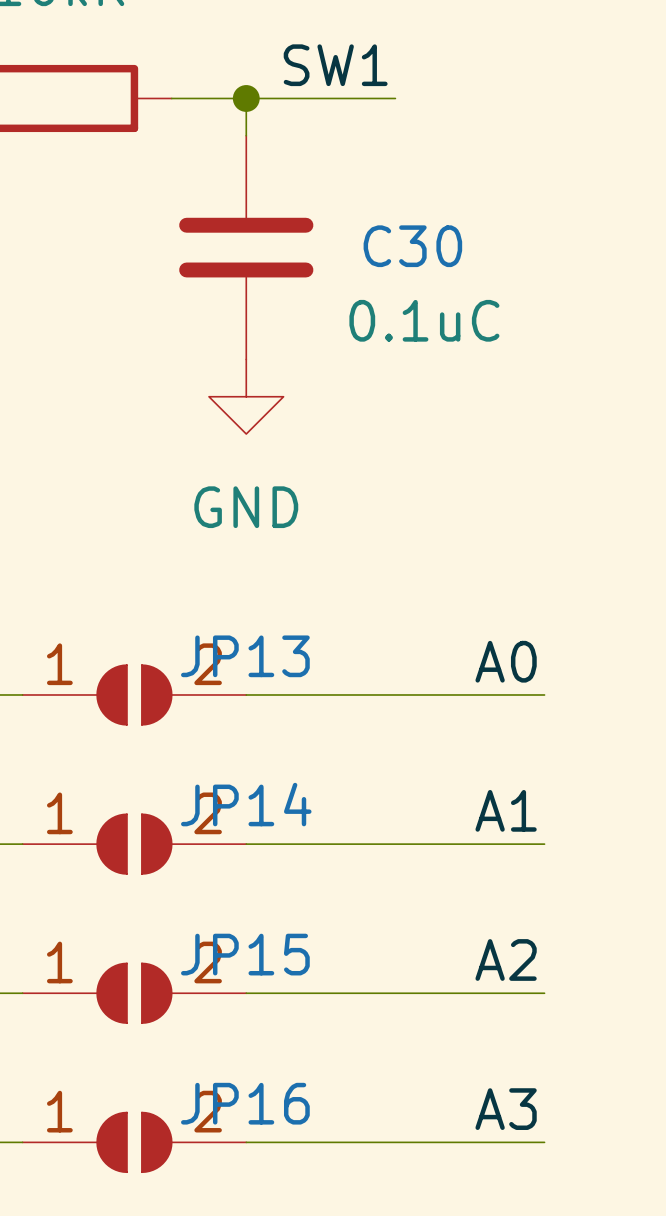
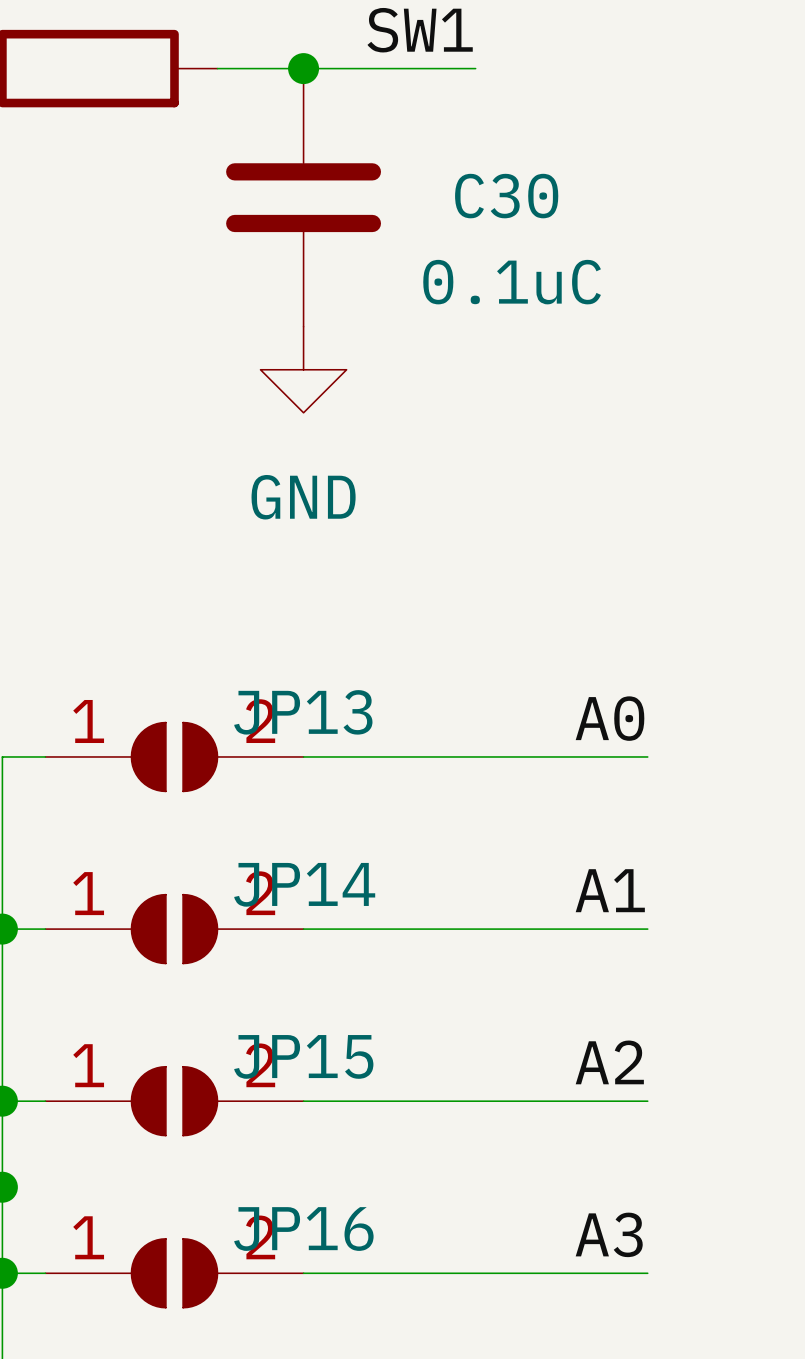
C30 position: (246, 247) -> (303, 197)
power symbol position: GND (246, 396) -> GND (303, 369)

